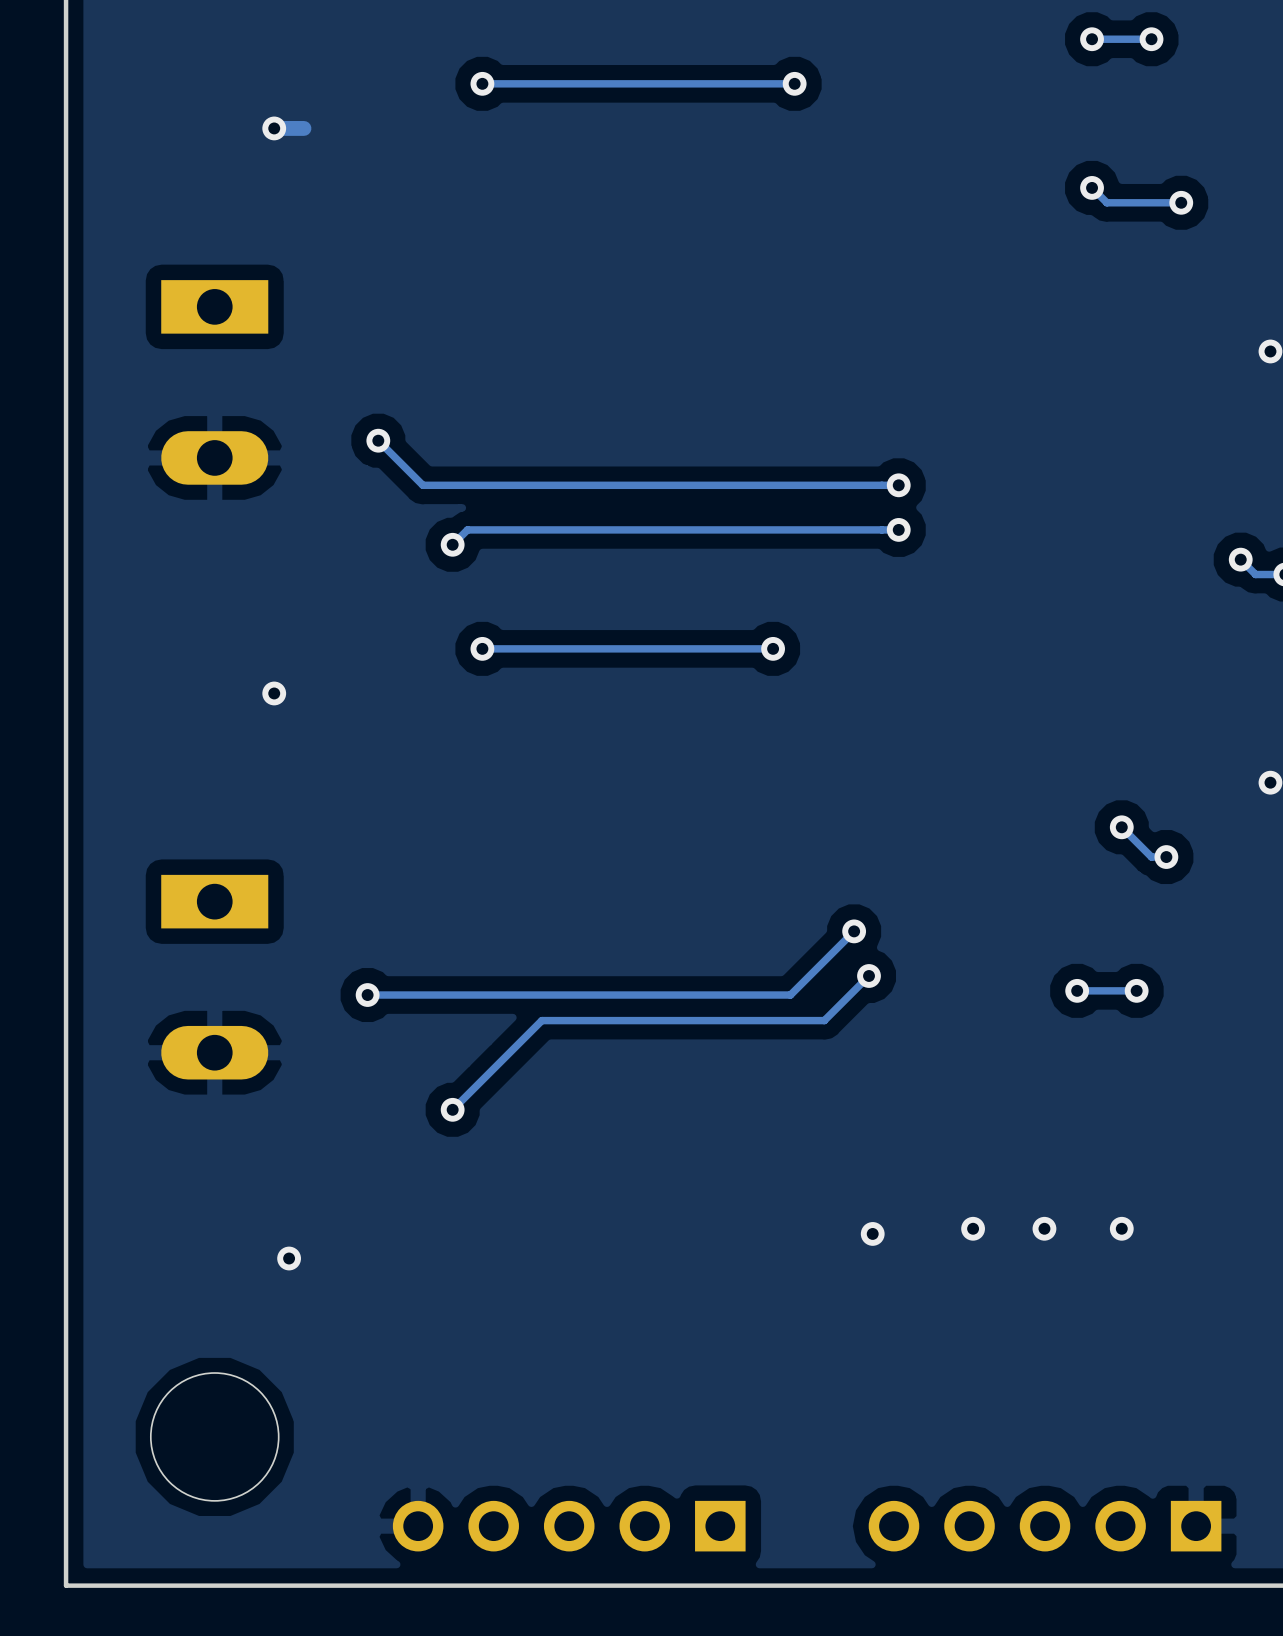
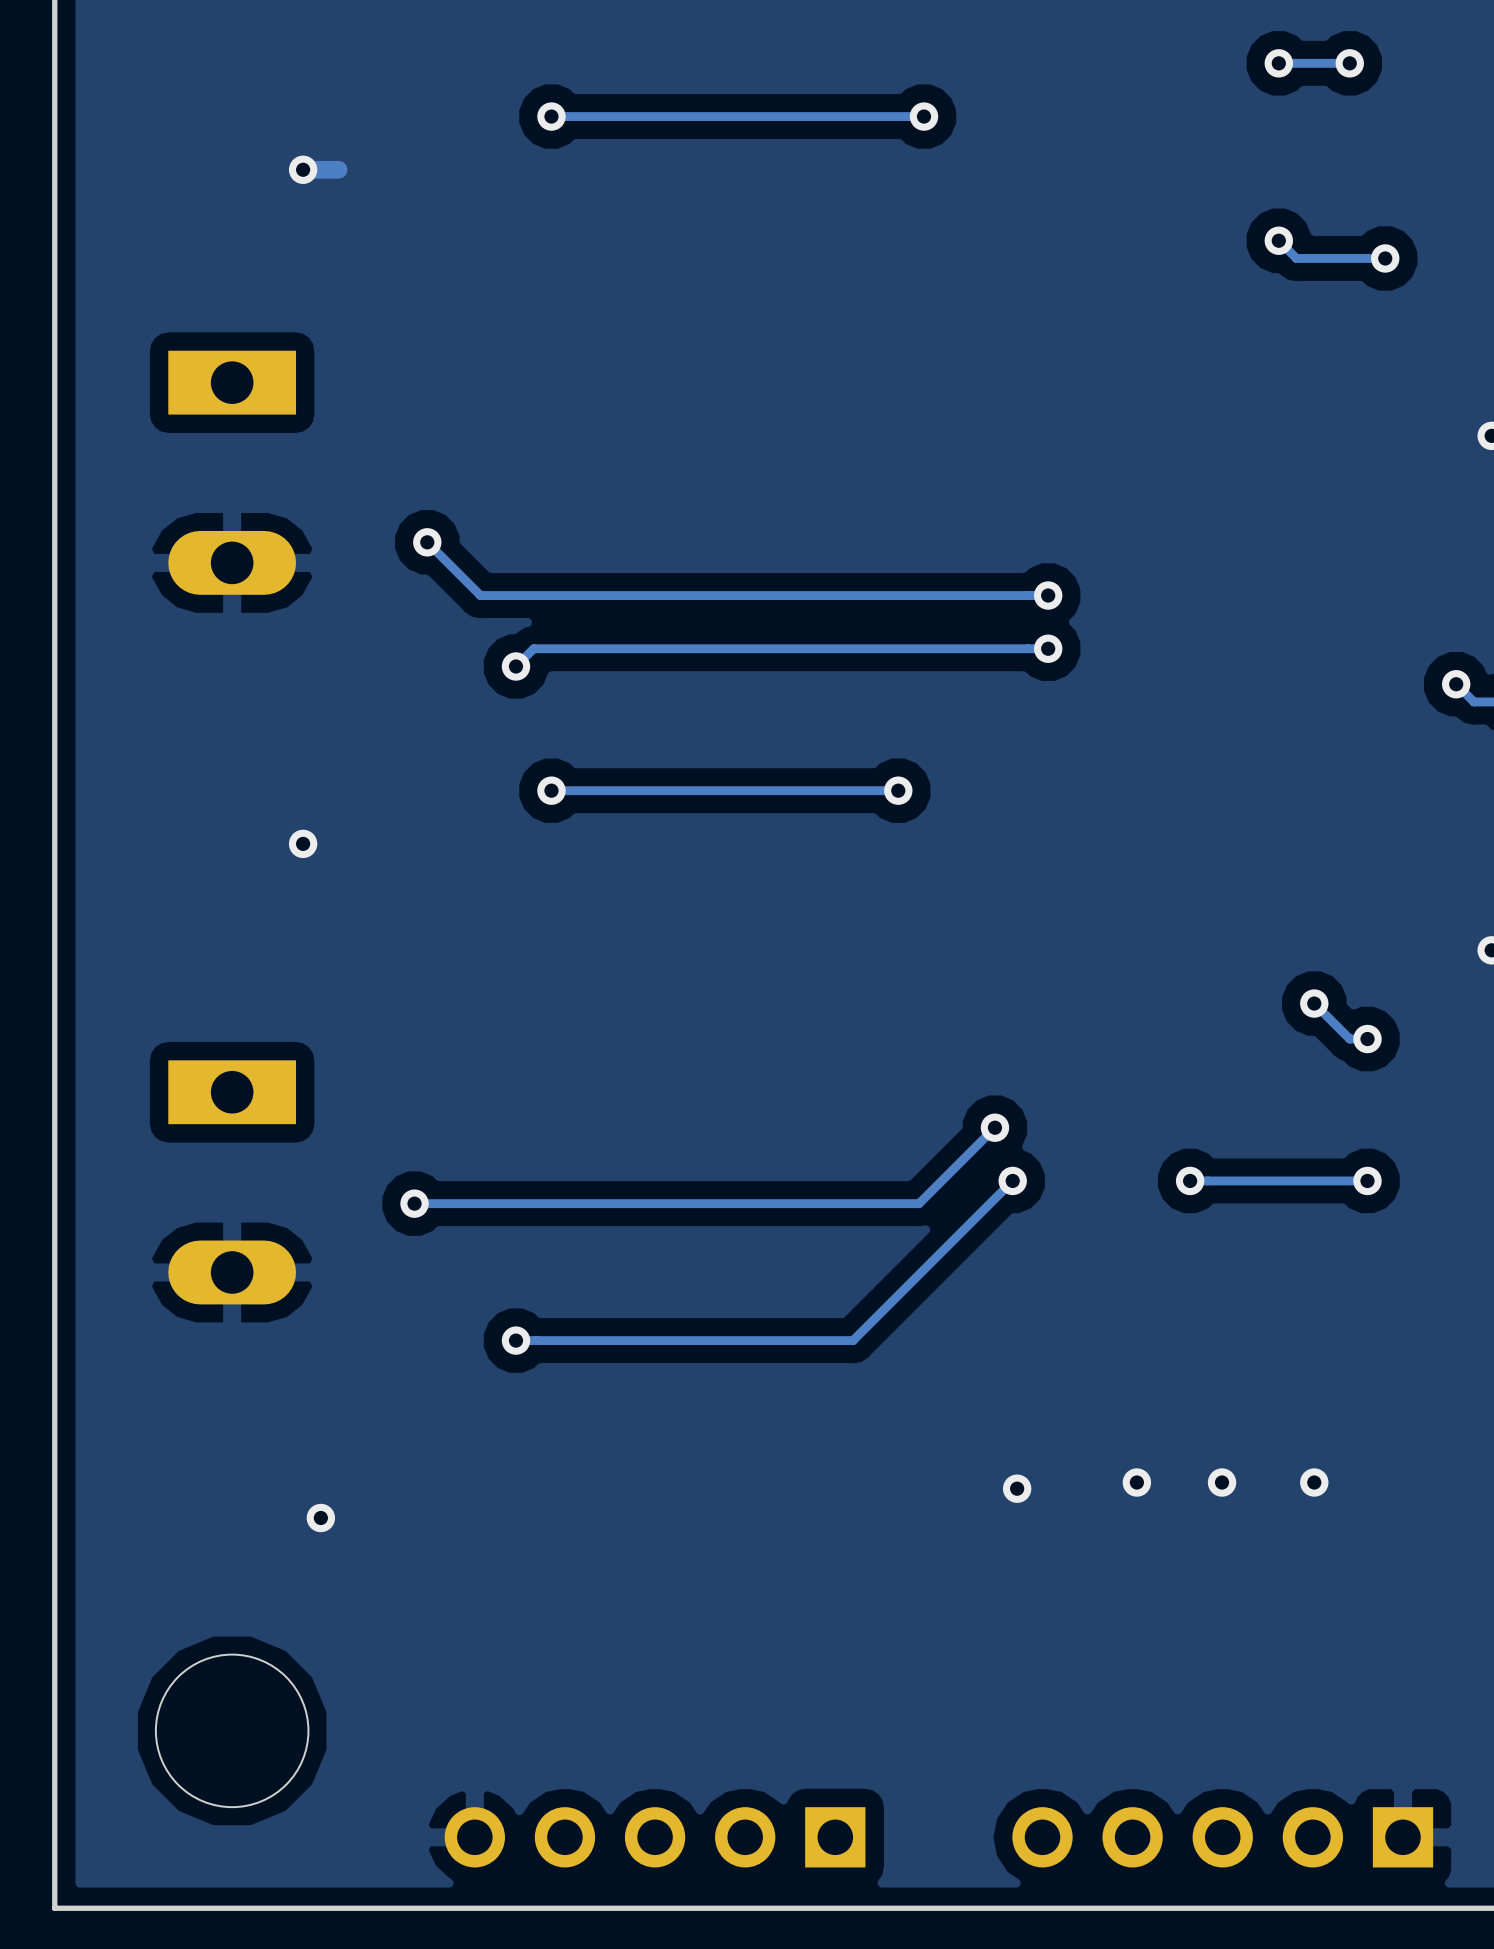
via: none -> (1190, 1180)
track: none -> (1367, 1180) (1190, 1180)
via: (1077, 990) -> none
track: (1136, 990) (1077, 990) -> none
via position: (1136, 990) -> (1367, 1180)
track: (824, 1020) (541, 1020) (452, 1109) -> (959, 1234) (853, 1340) (516, 1340)

